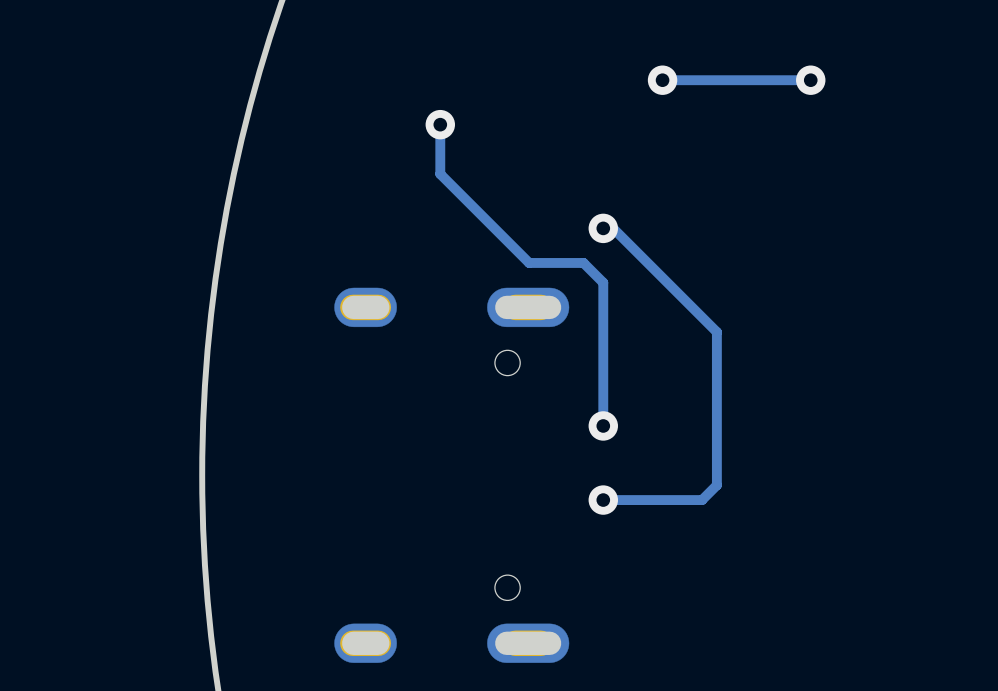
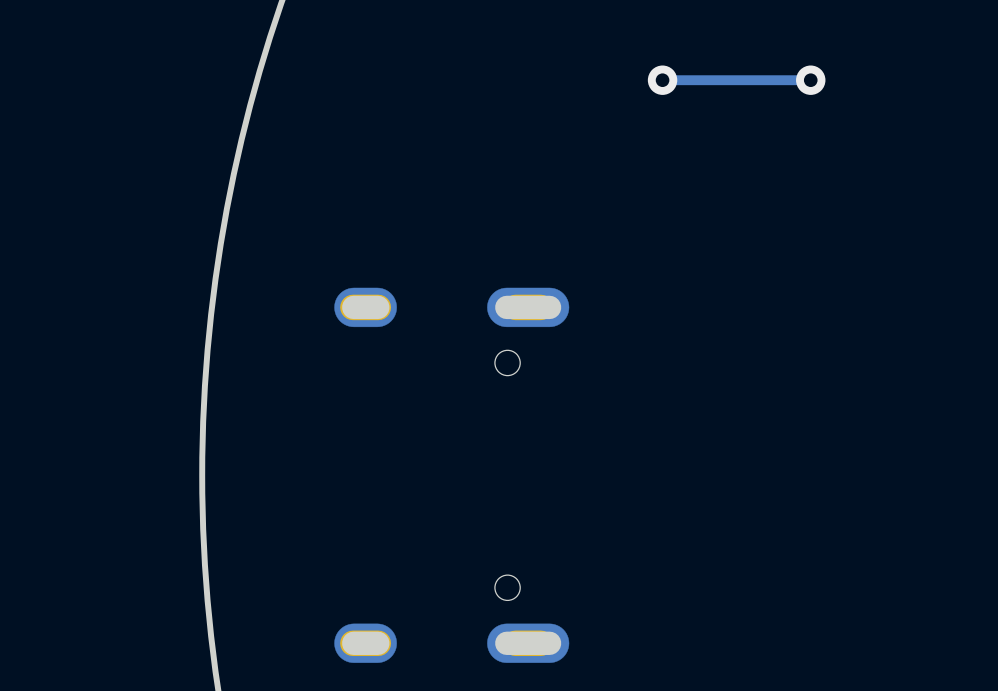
track: (440, 124) (440, 174) (529, 262) (583, 262) (603, 282) (603, 425) -> none
via: (440, 124) -> none
track: (603, 228) (613, 228) (716, 332) (716, 485) (702, 500) (603, 500) -> none
via: (603, 228) -> none
via: (603, 425) -> none
via: (603, 500) -> none

